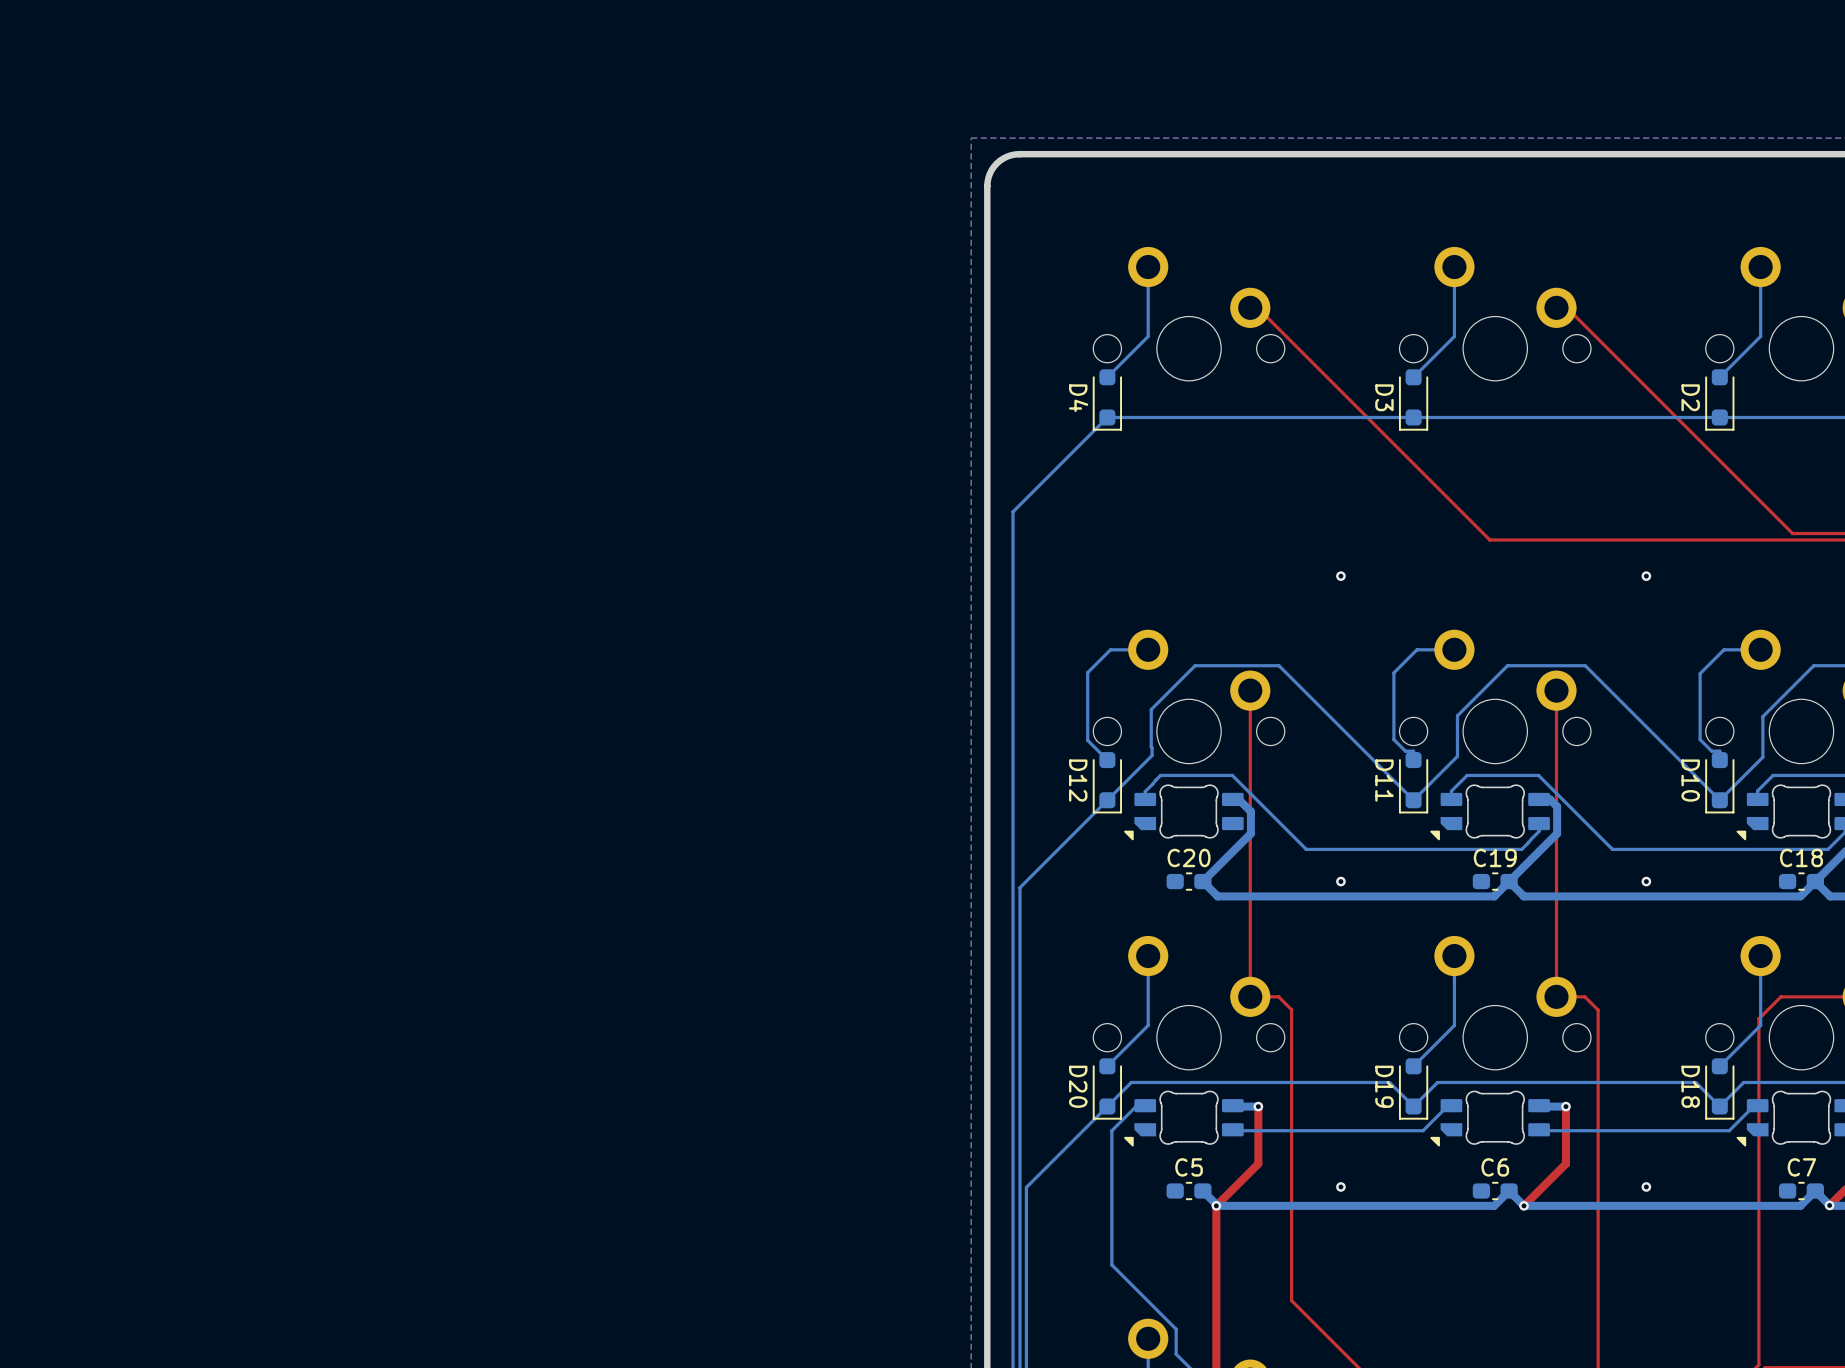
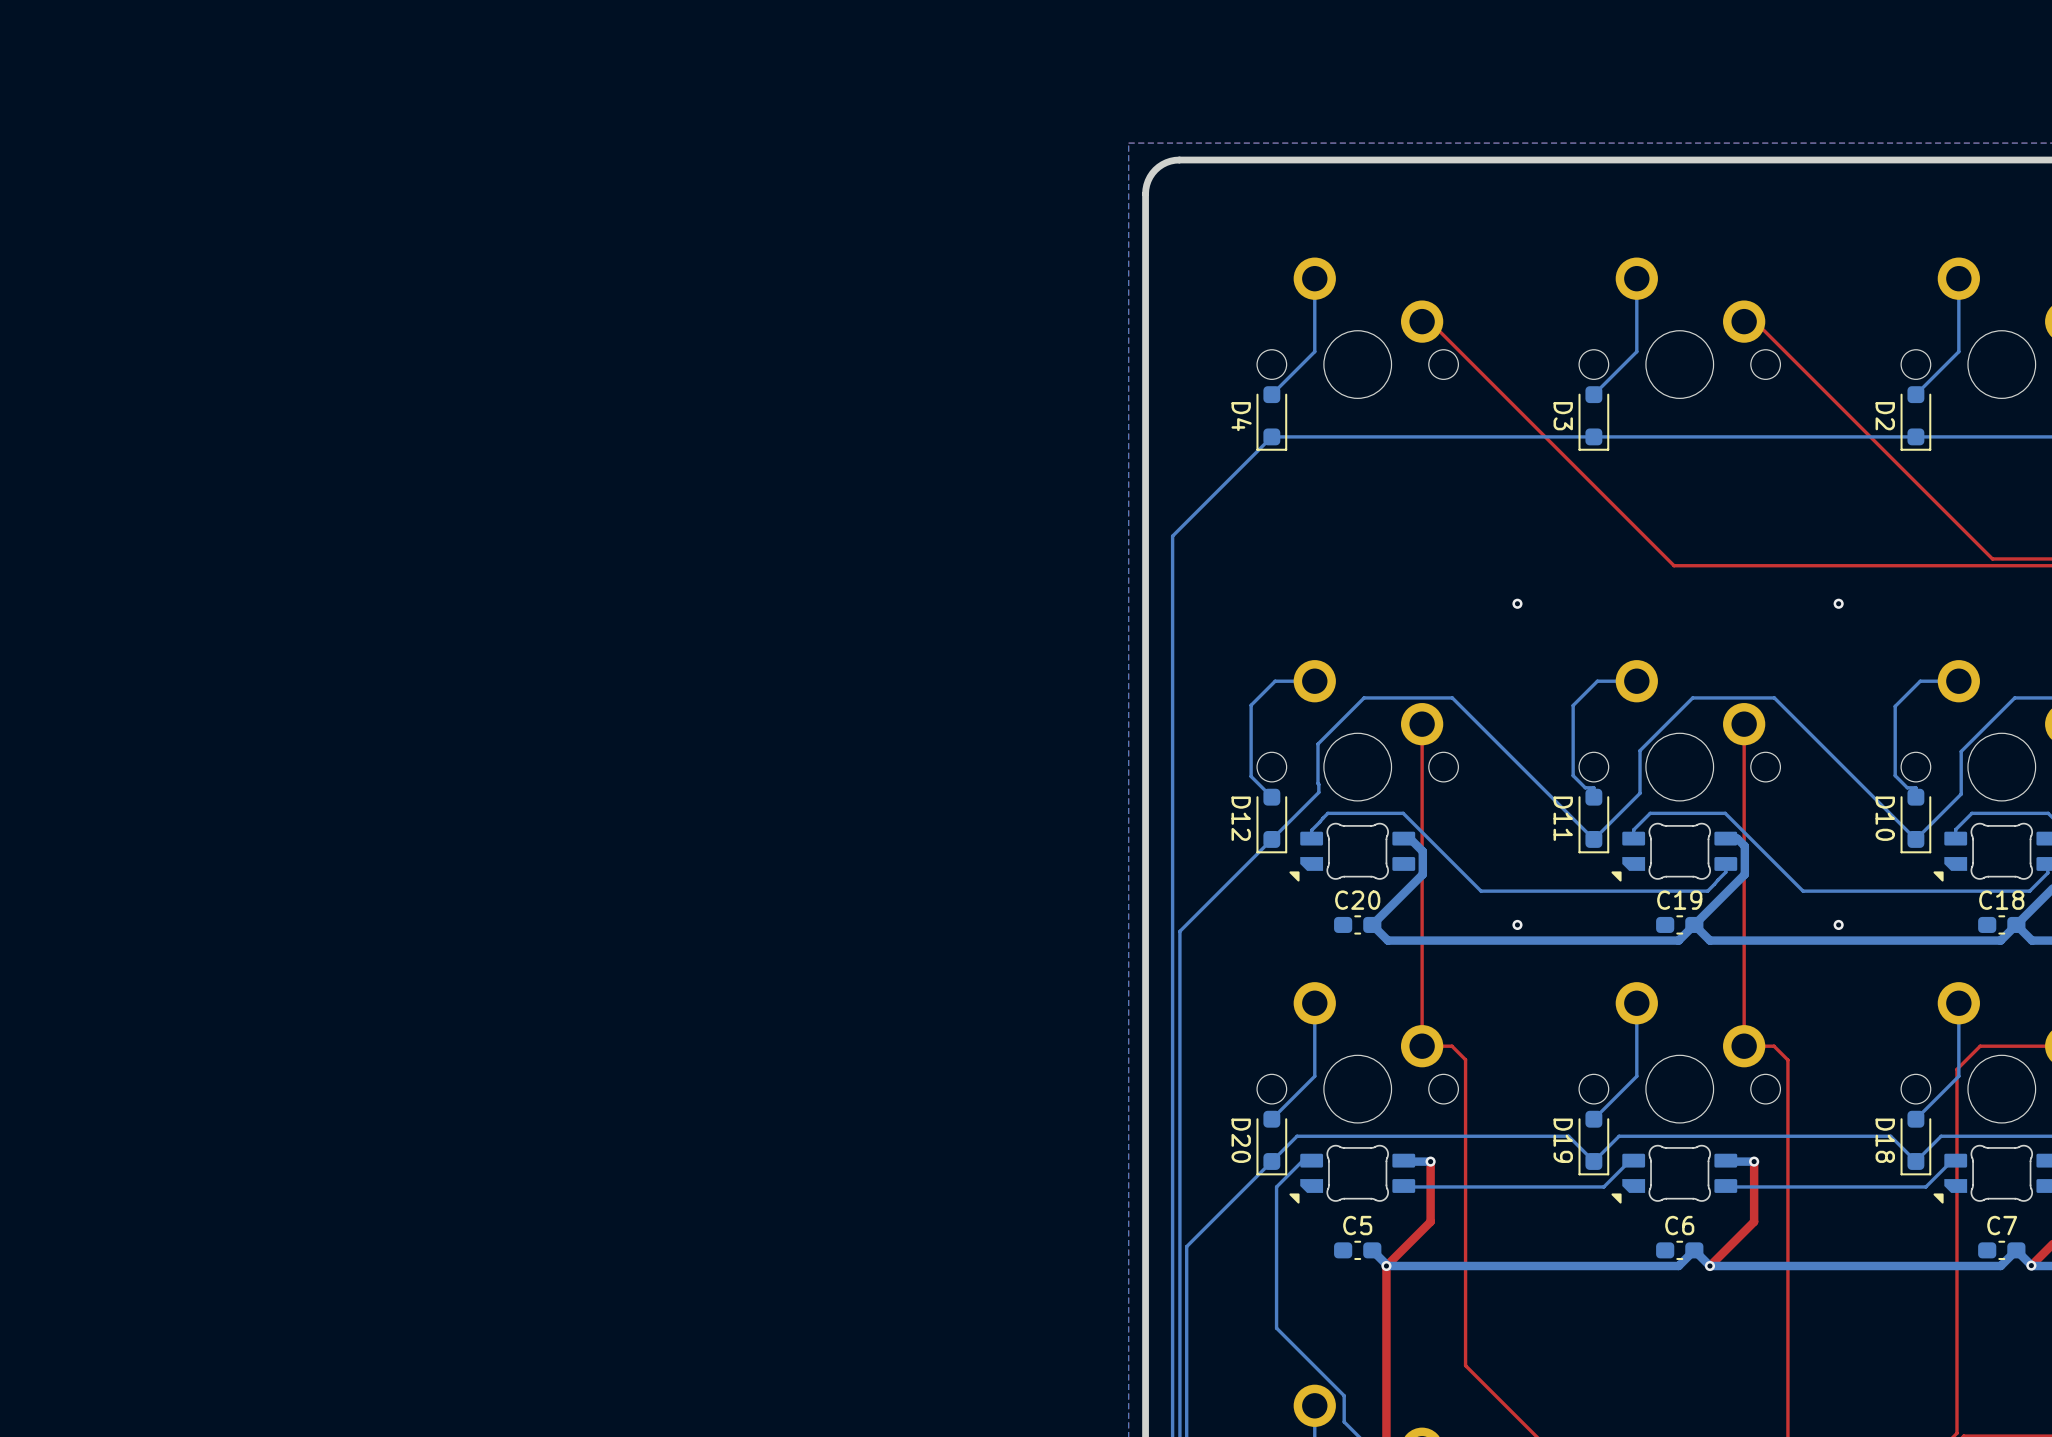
via: (1340, 1186) -> none
via: (1646, 1186) -> none

